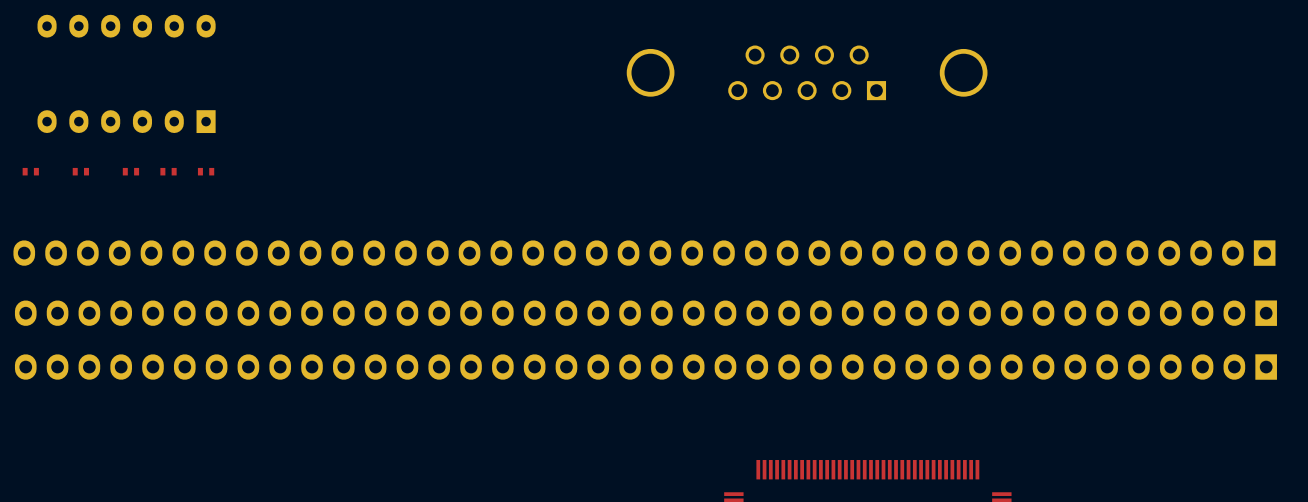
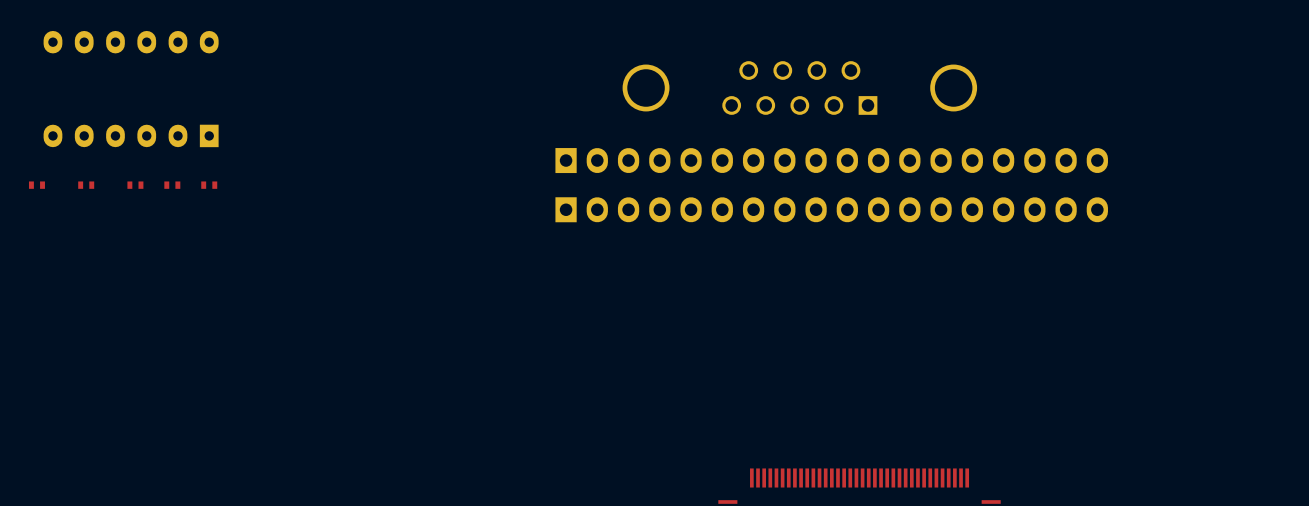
part: none -> (831, 160)
part: none -> (831, 209)
part: (644, 253) -> none
part: (645, 313) -> none
part: (645, 367) -> none

